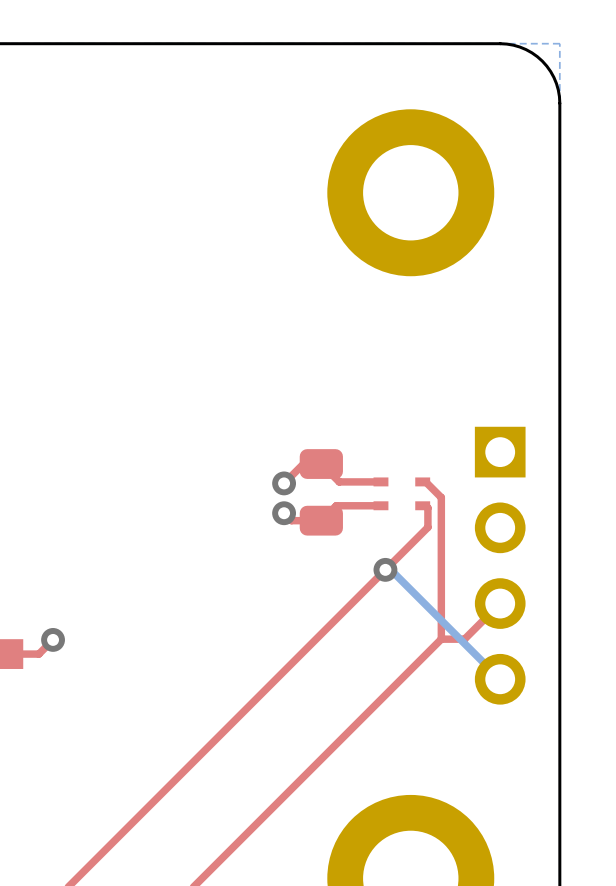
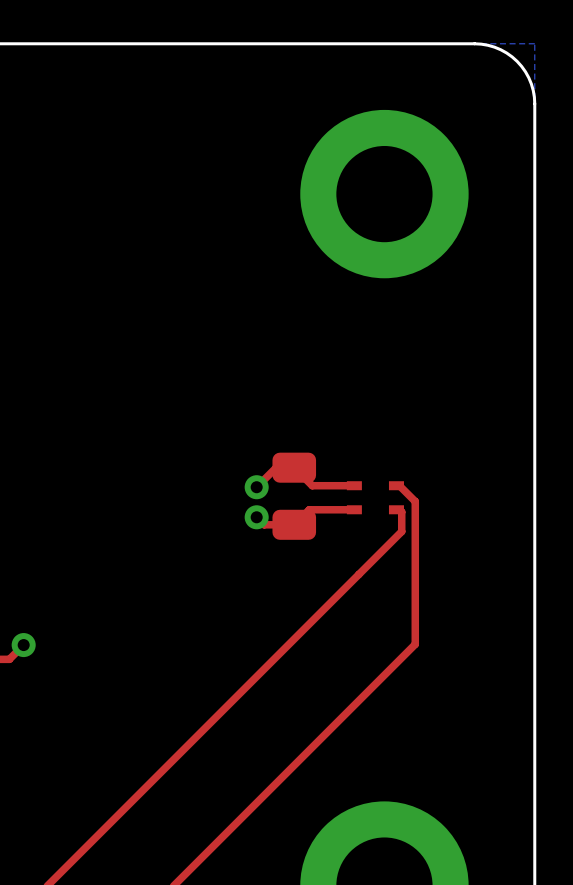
part: (500, 565) -> none
bottom track: (385, 569) (390, 569) (500, 679) -> none
via: (385, 569) -> none
top track: (500, 603) (464, 639) (441, 639) -> none

